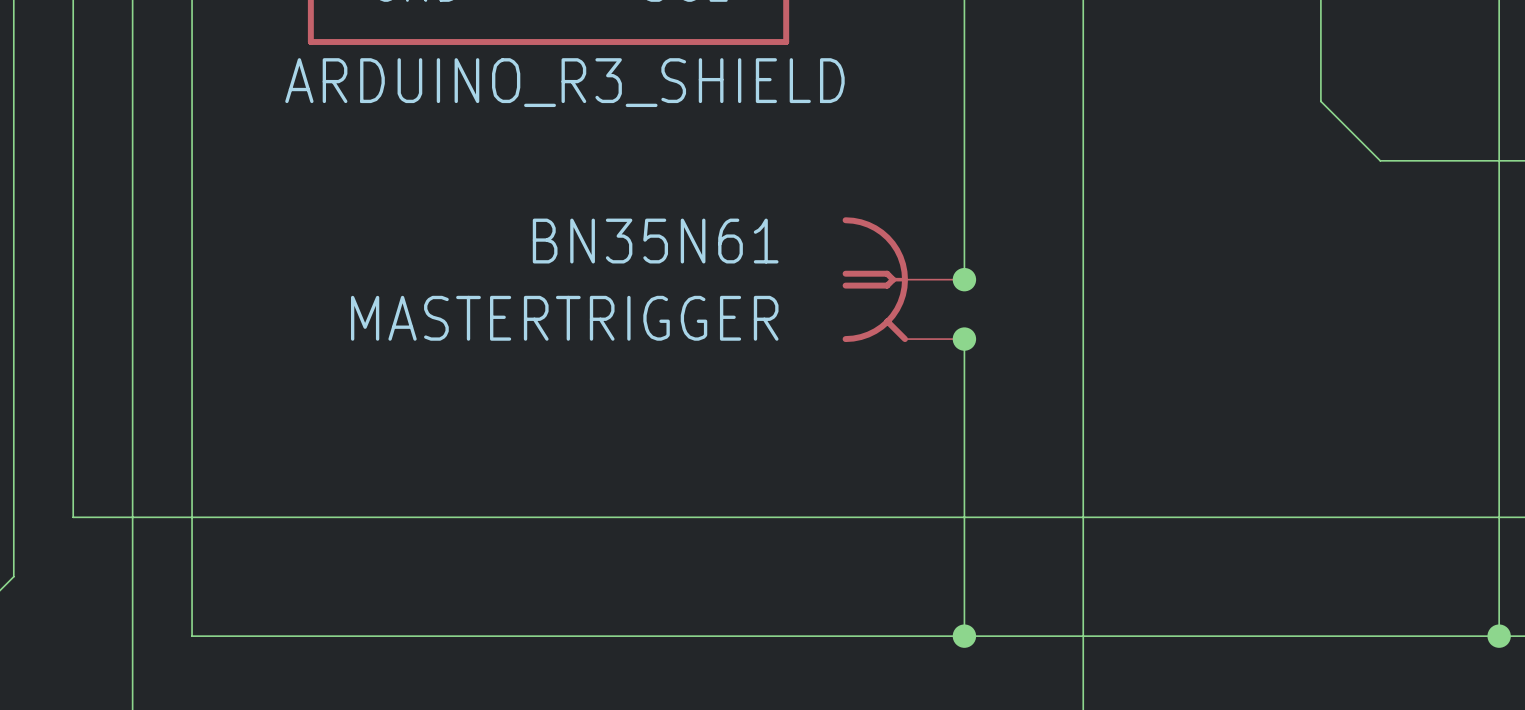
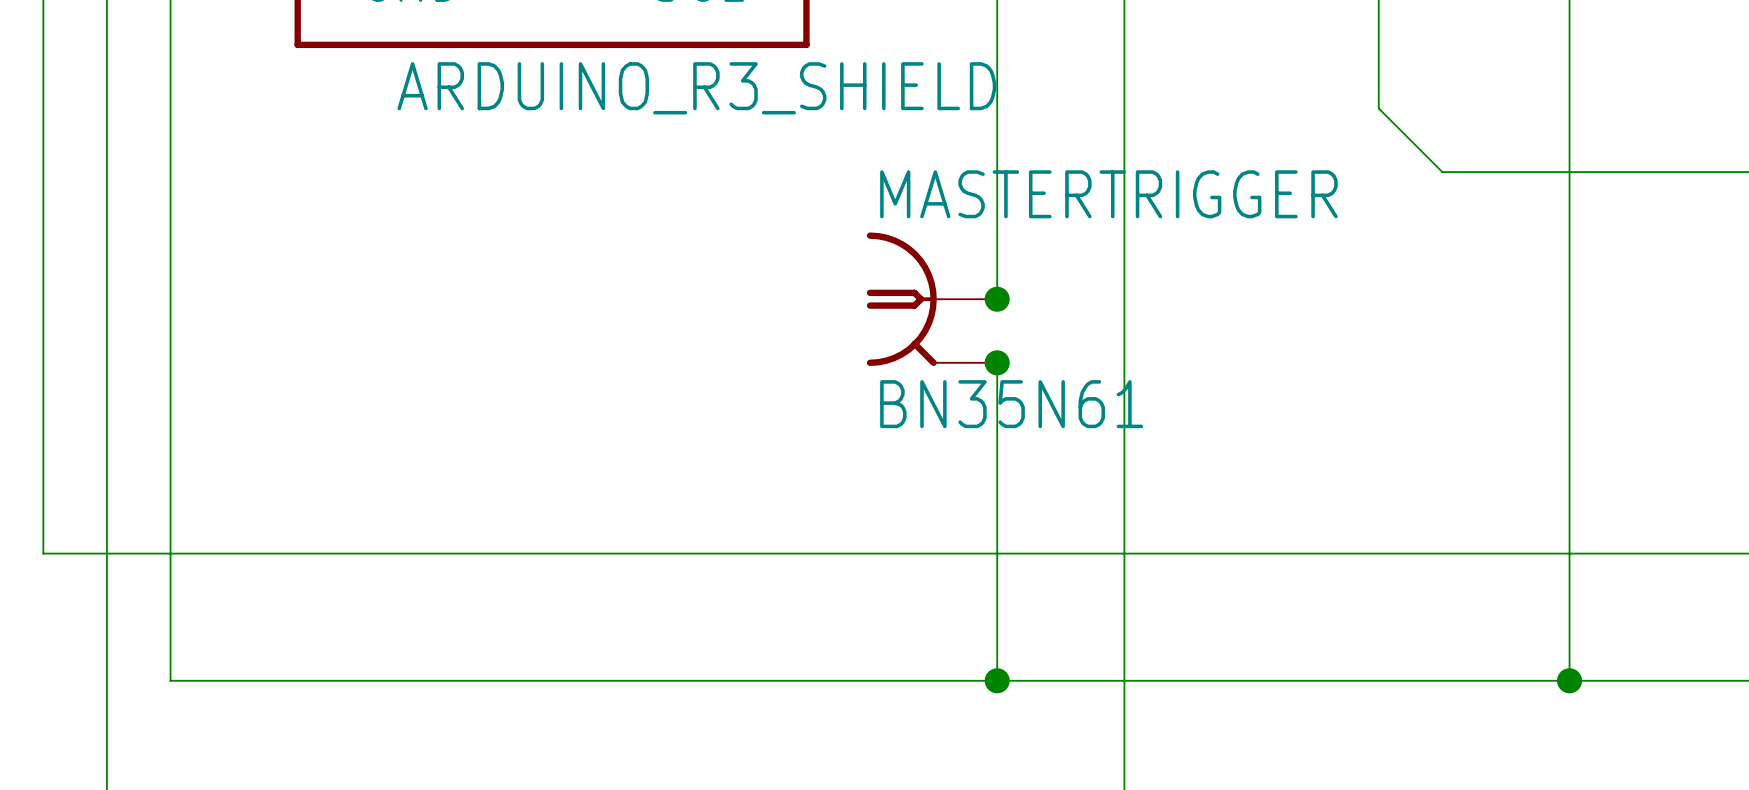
part value position: ARDUINO_R3_SHIELD (564, 82) -> ARDUINO_R3_SHIELD (696, 88)
MASTERTRIGGER value position: BN35N61 (655, 241) -> BN35N61 (1011, 404)
MASTERTRIGGER name position: MASTERTRIGGER (564, 318) -> MASTERTRIGGER (1108, 194)

